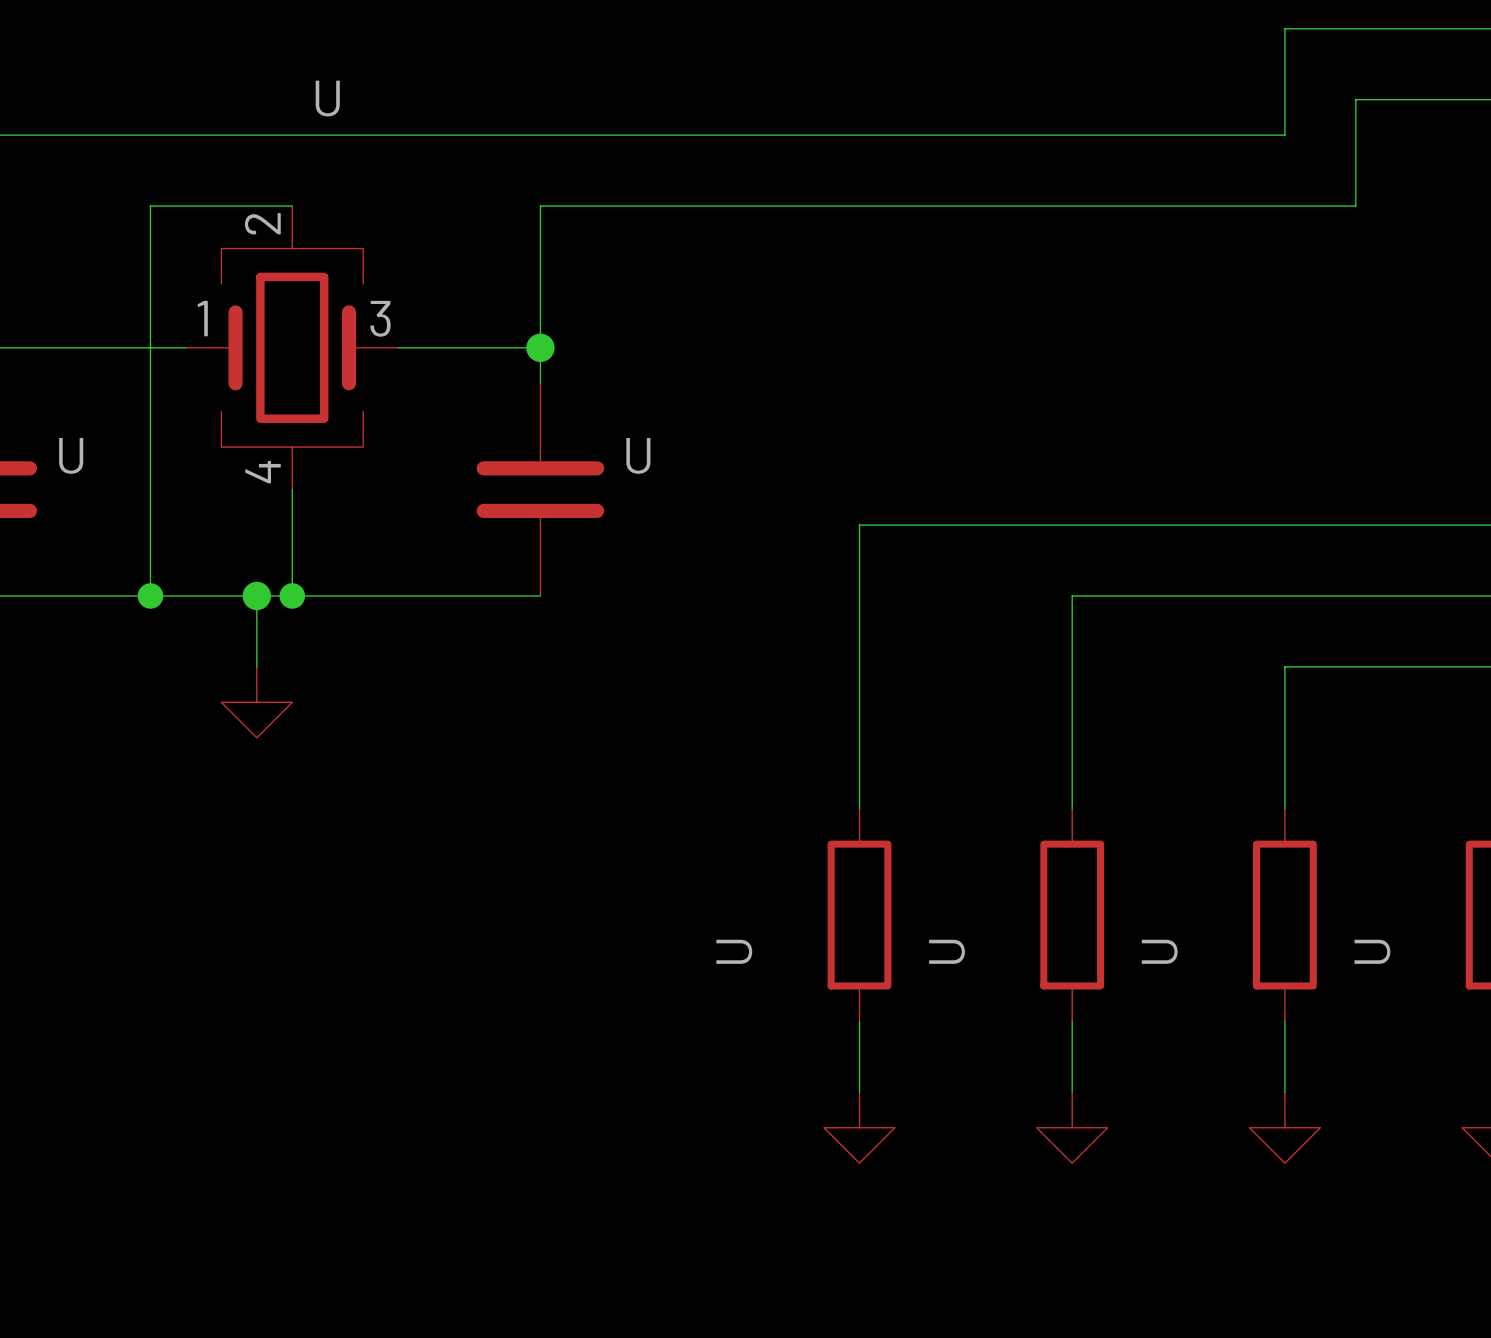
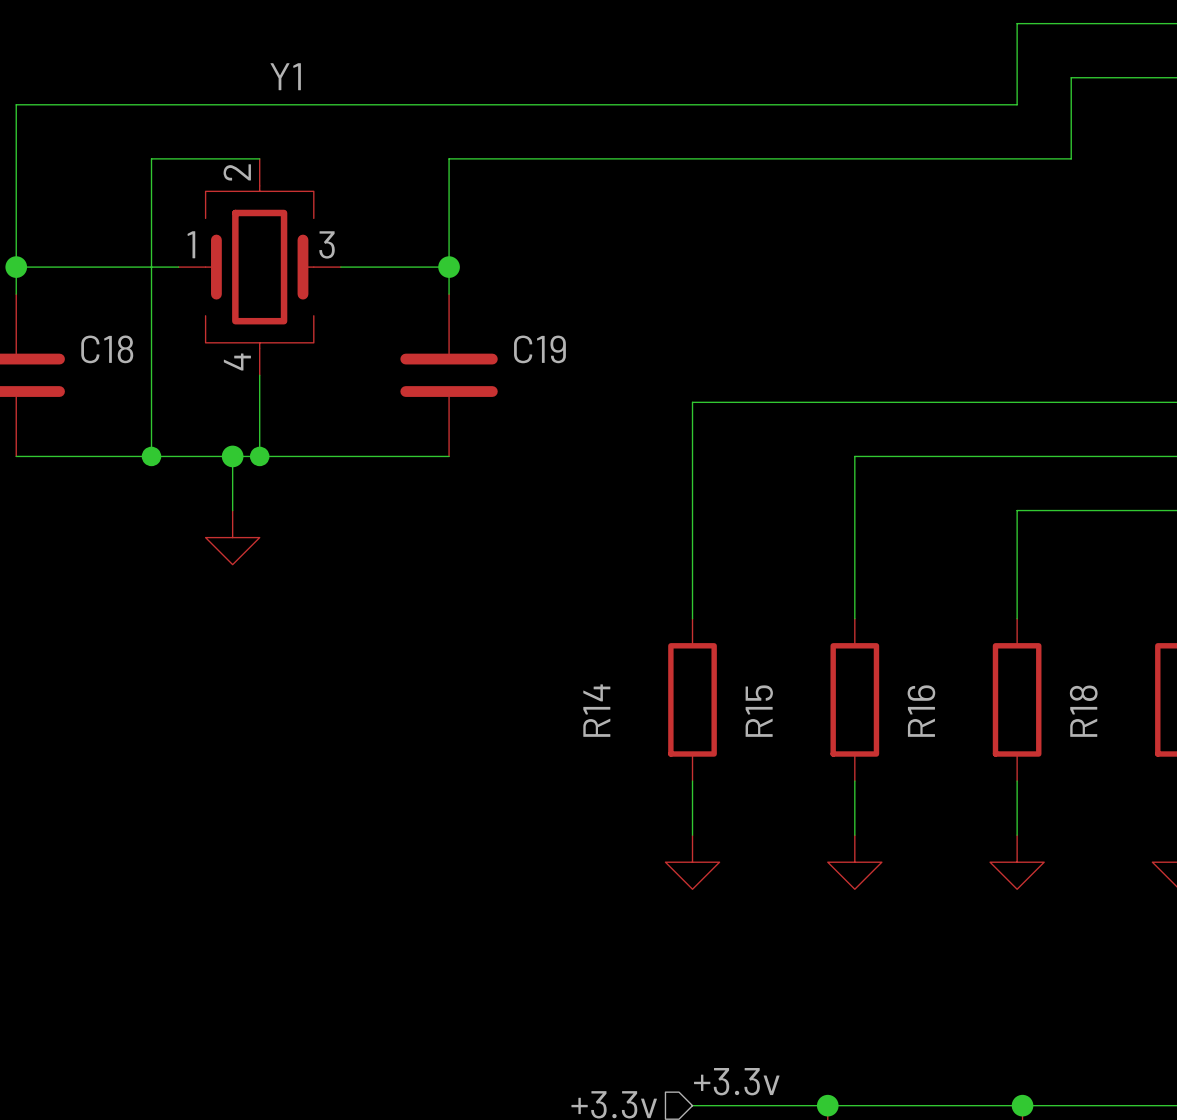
U name: U (327, 98) -> Y1 (285, 76)
U name: U (71, 455) -> C18 (107, 349)
U name: U (638, 455) -> C19 (539, 349)
U name: U (734, 951) -> R14 (596, 710)
U name: U (947, 951) -> R15 (759, 711)
U name: U (1159, 951) -> R16 (921, 711)
U name: U (1372, 951) -> R18 (1083, 711)

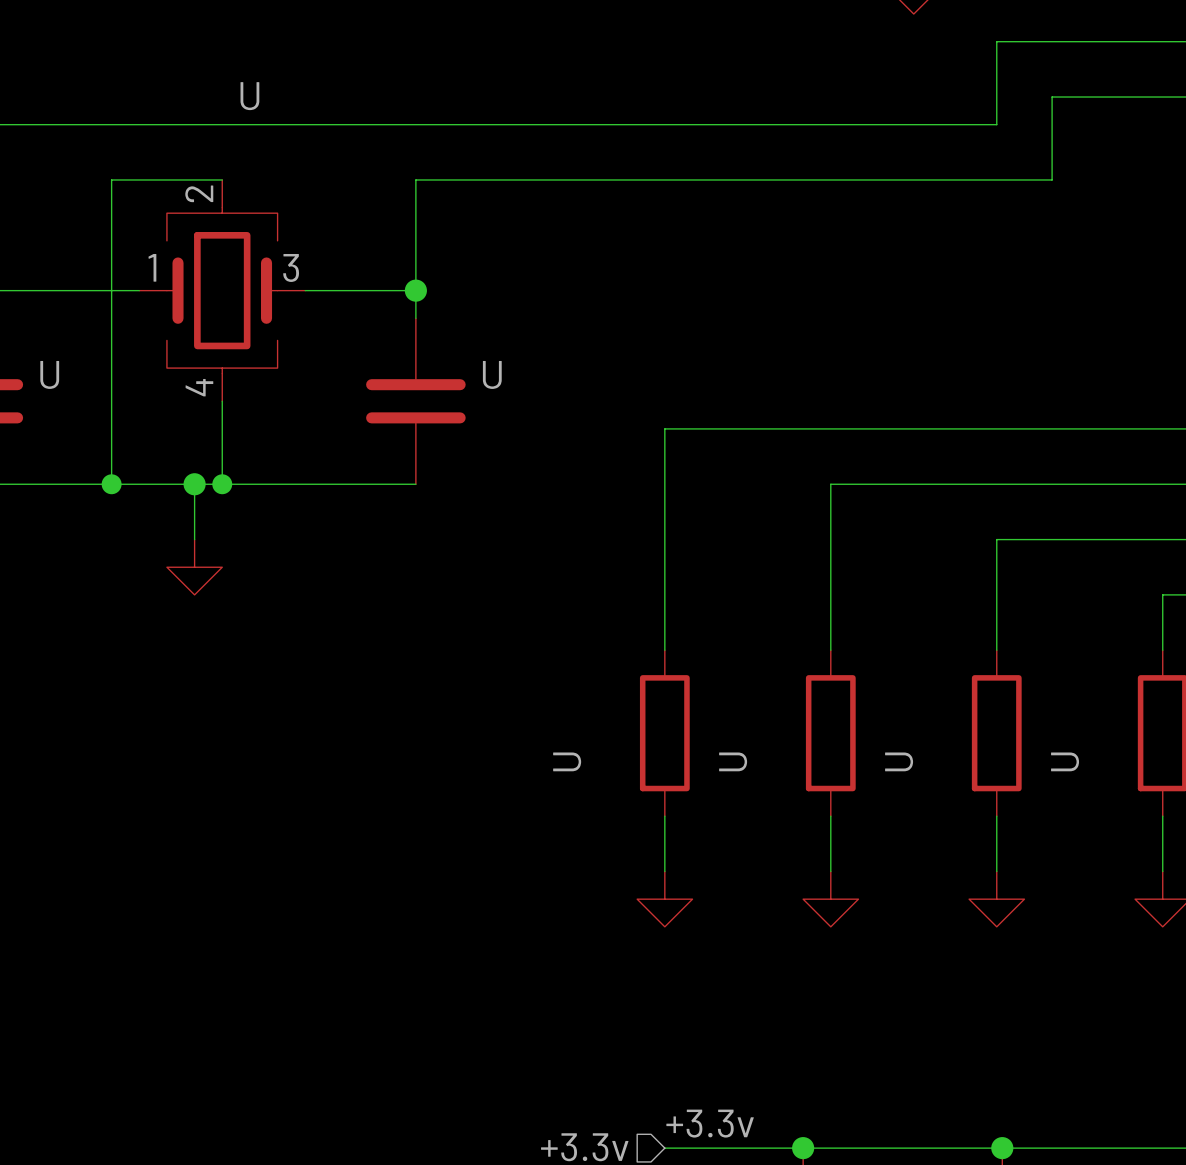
Y1 name: Y1 (285, 76) -> U (249, 96)
C18 name: C18 (107, 349) -> U (49, 374)
C19 name: C19 (539, 349) -> U (492, 374)
R14 name: R14 (596, 710) -> U (567, 761)
R15 name: R15 (759, 711) -> U (733, 761)
R16 name: R16 (921, 711) -> U (899, 761)
R18 name: R18 (1083, 711) -> U (1065, 761)

